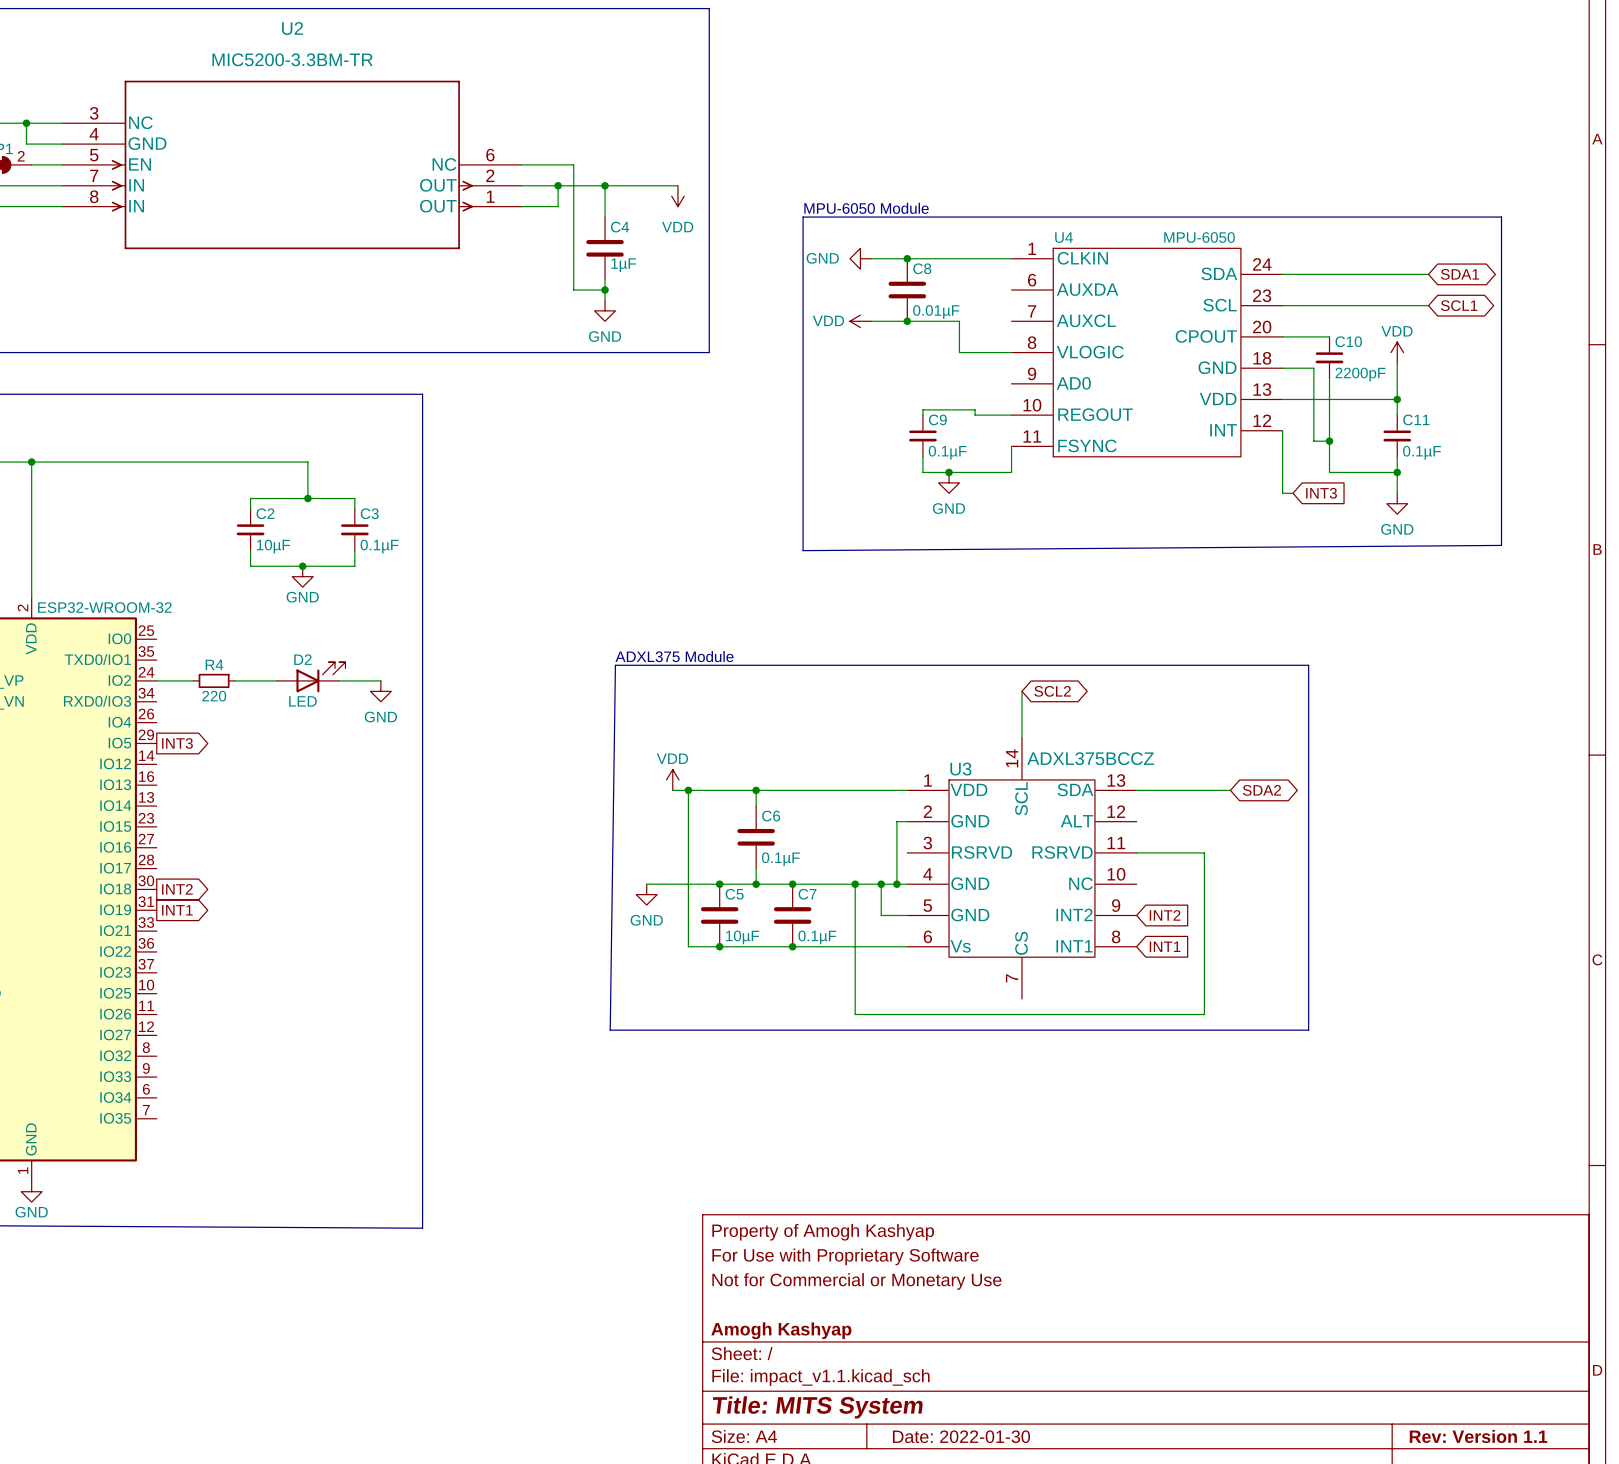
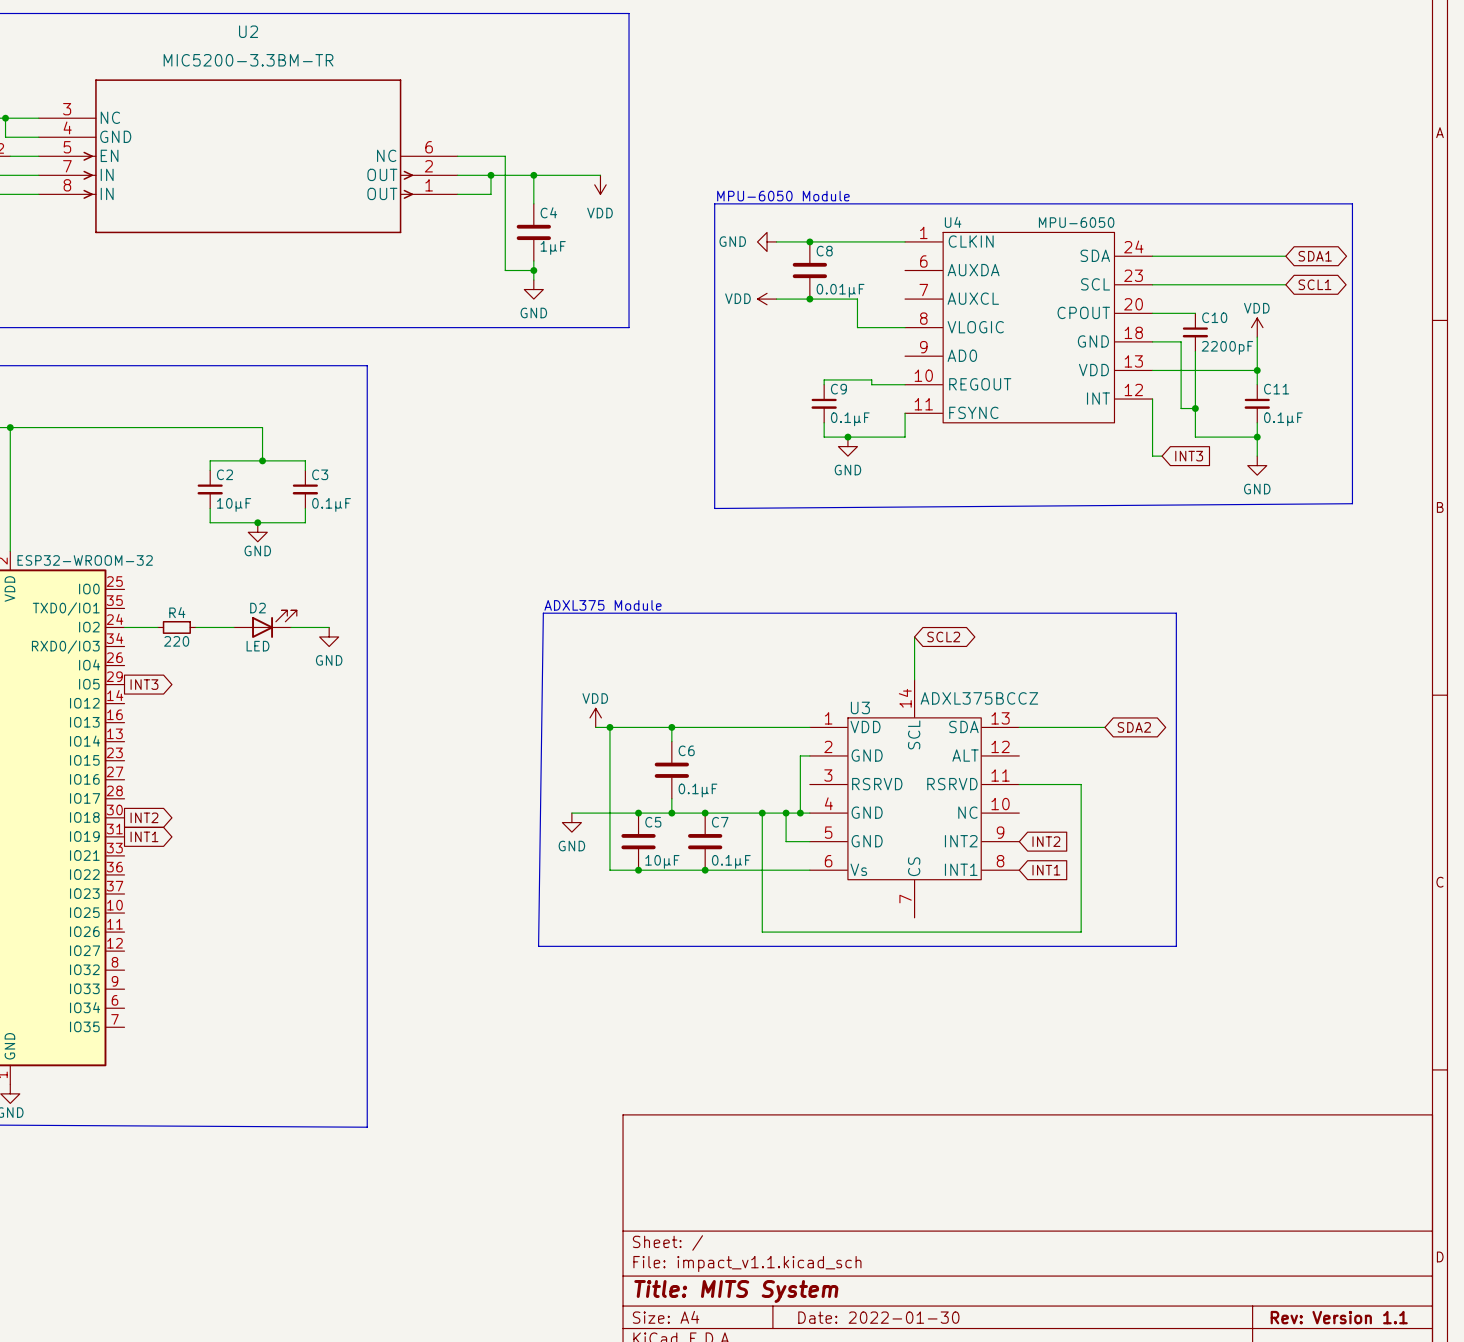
title block: Property of Amogh Kashyap (823, 1232) -> none
title block: For Use with Proprietary Software (845, 1256) -> none
title block: Not for Commercial or Monetary Use (856, 1281) -> none
title block: Amogh Kashyap (781, 1330) -> none

